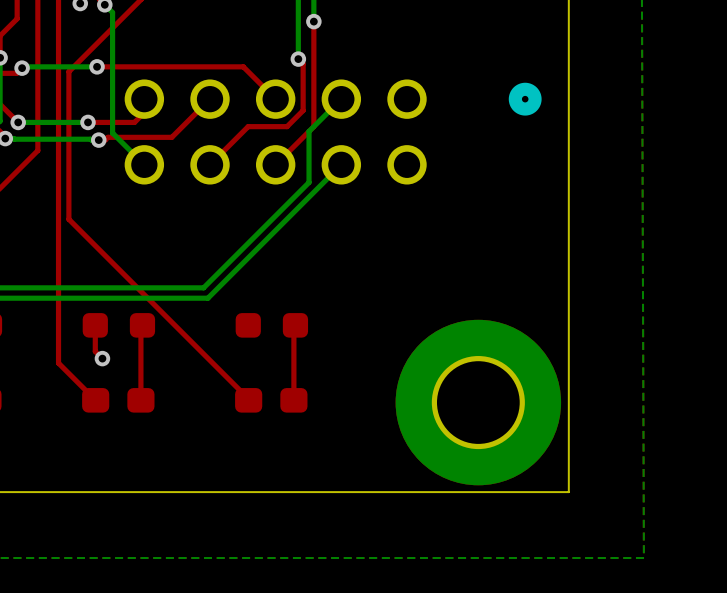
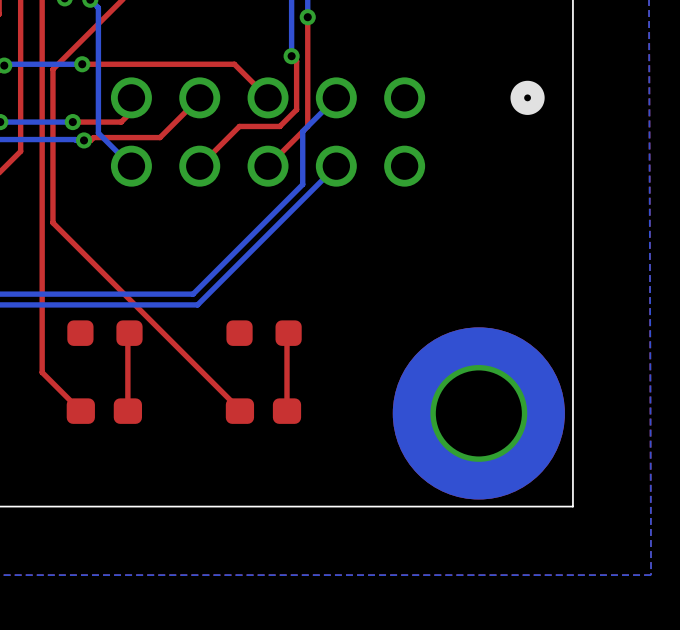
top track: (95, 325) (95, 351) (102, 358) -> none
via: (102, 358) -> none

